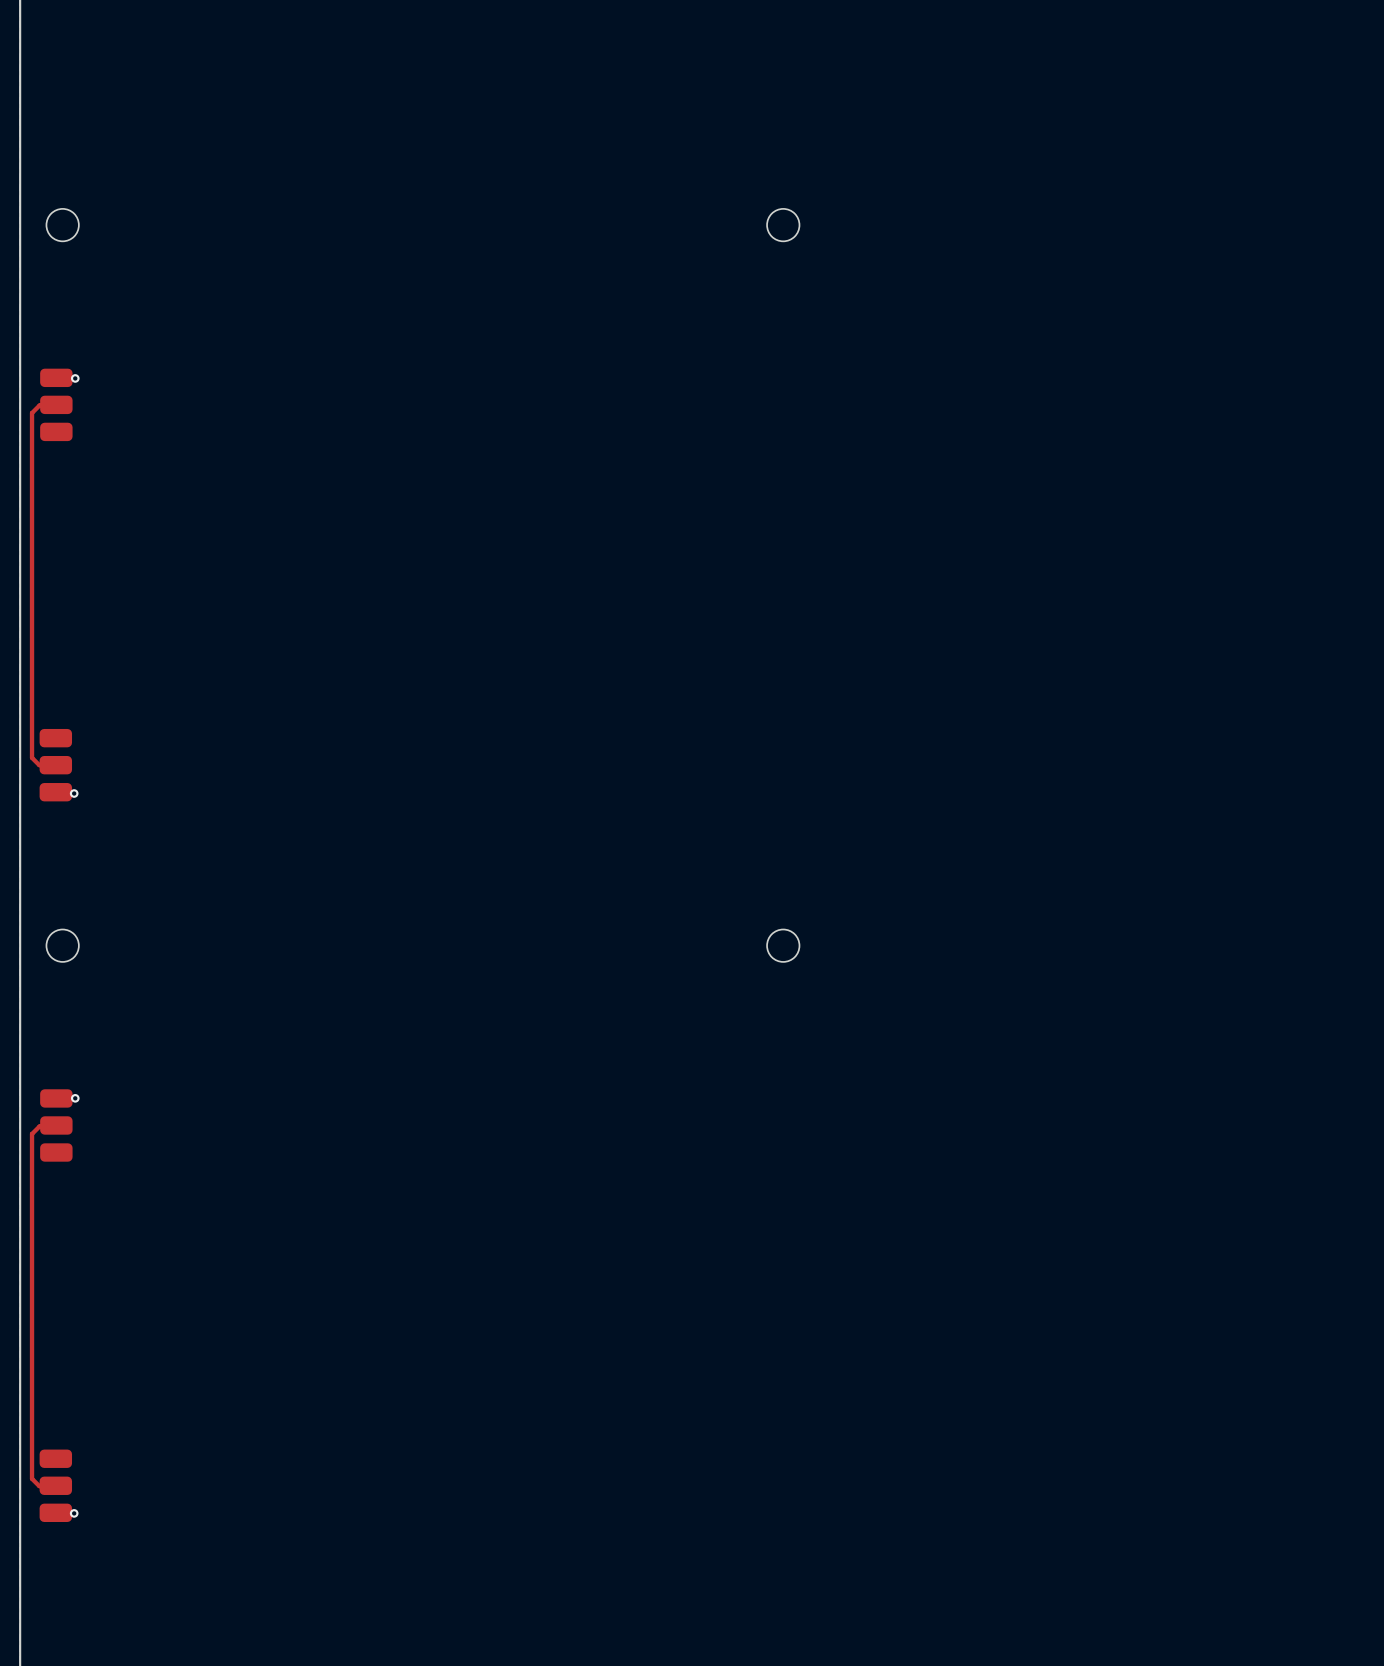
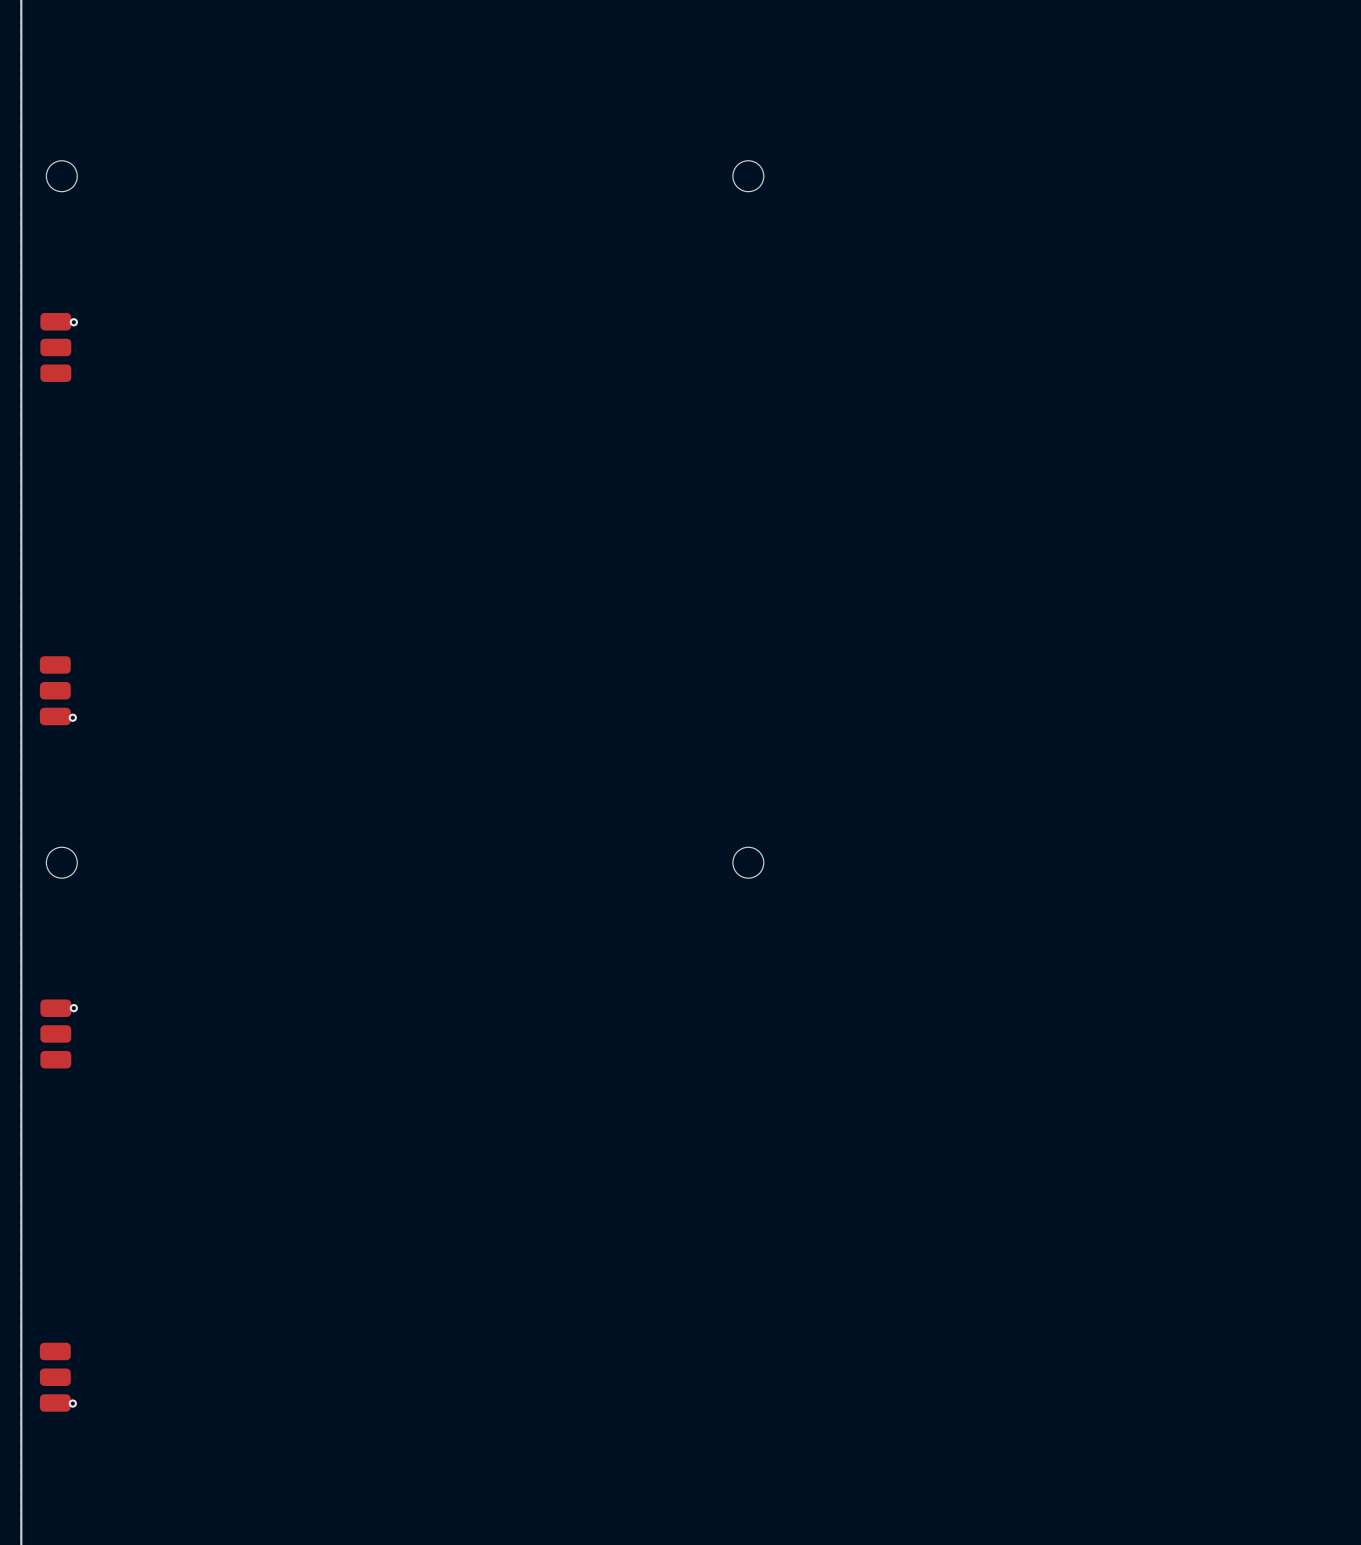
top track: (56, 404) (39, 405) (32, 413) (32, 757) (39, 765) (55, 765) -> none
top track: (55, 1126) (39, 1126) (32, 1134) (32, 1478) (39, 1486) (55, 1486) -> none

